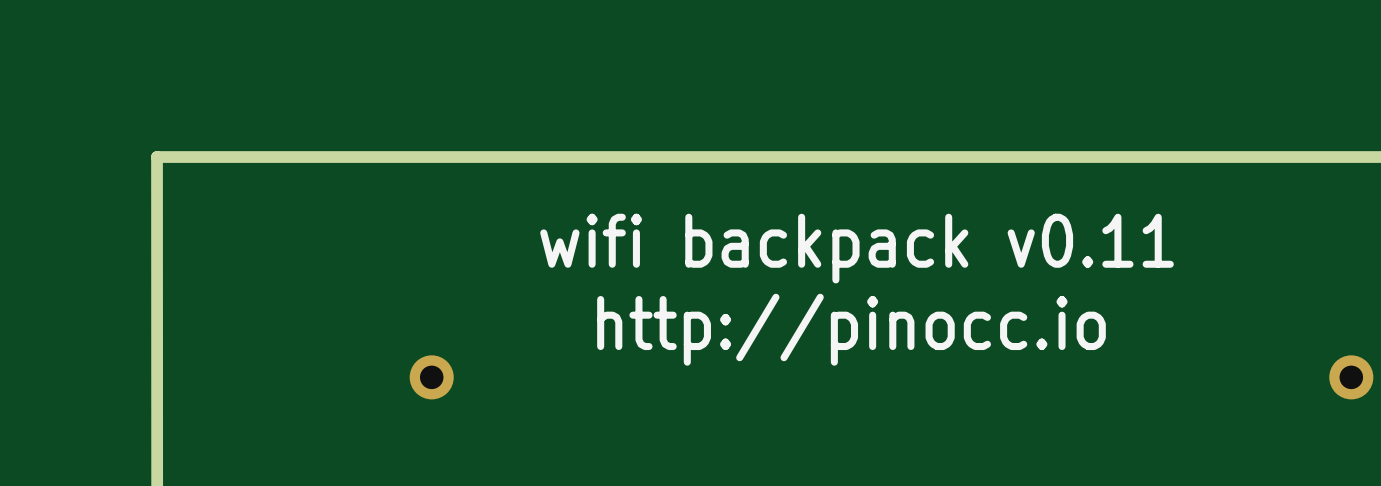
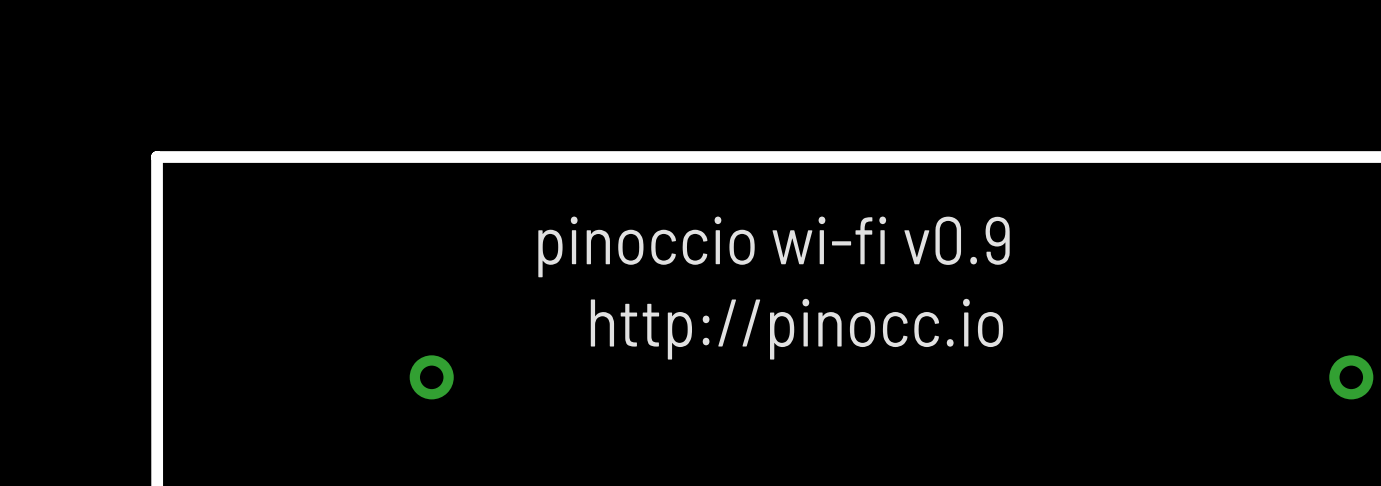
text: wifi backpack v0.11 (857, 248) -> pinoccio wi-fi v0.9 (774, 246)

